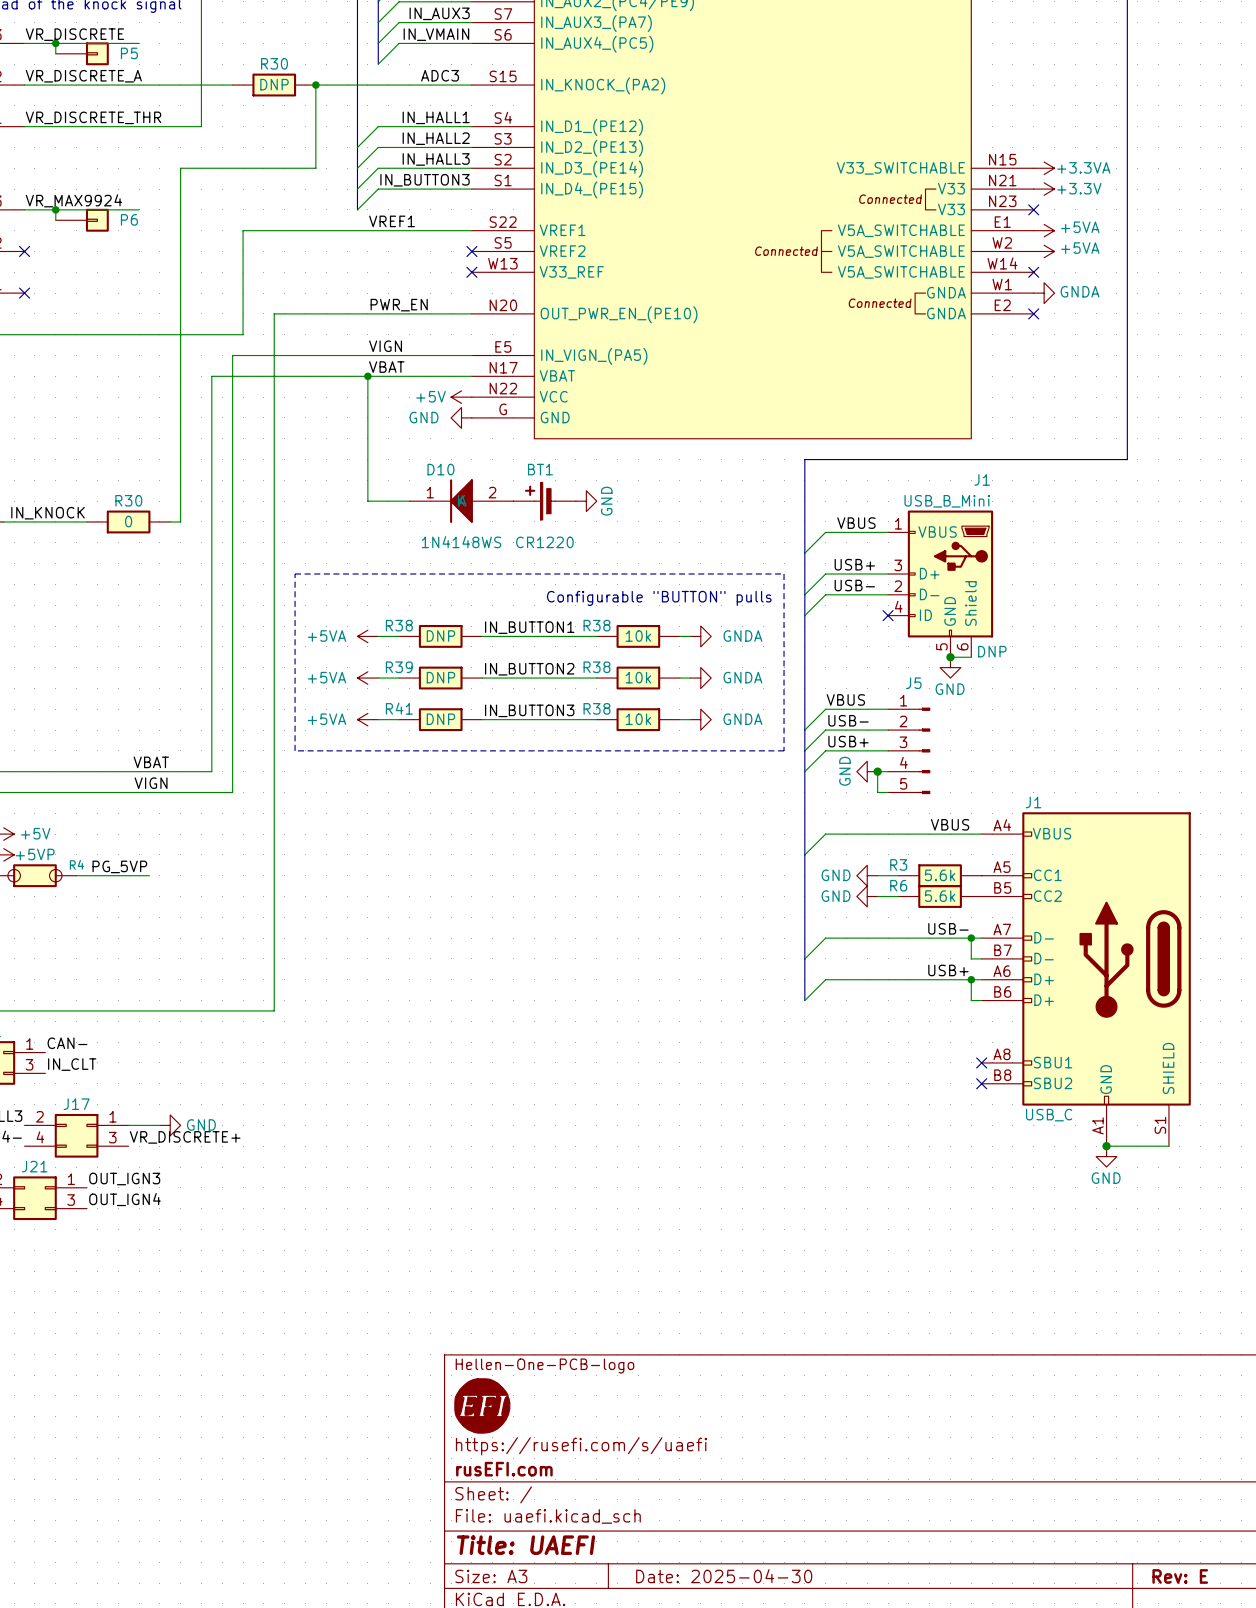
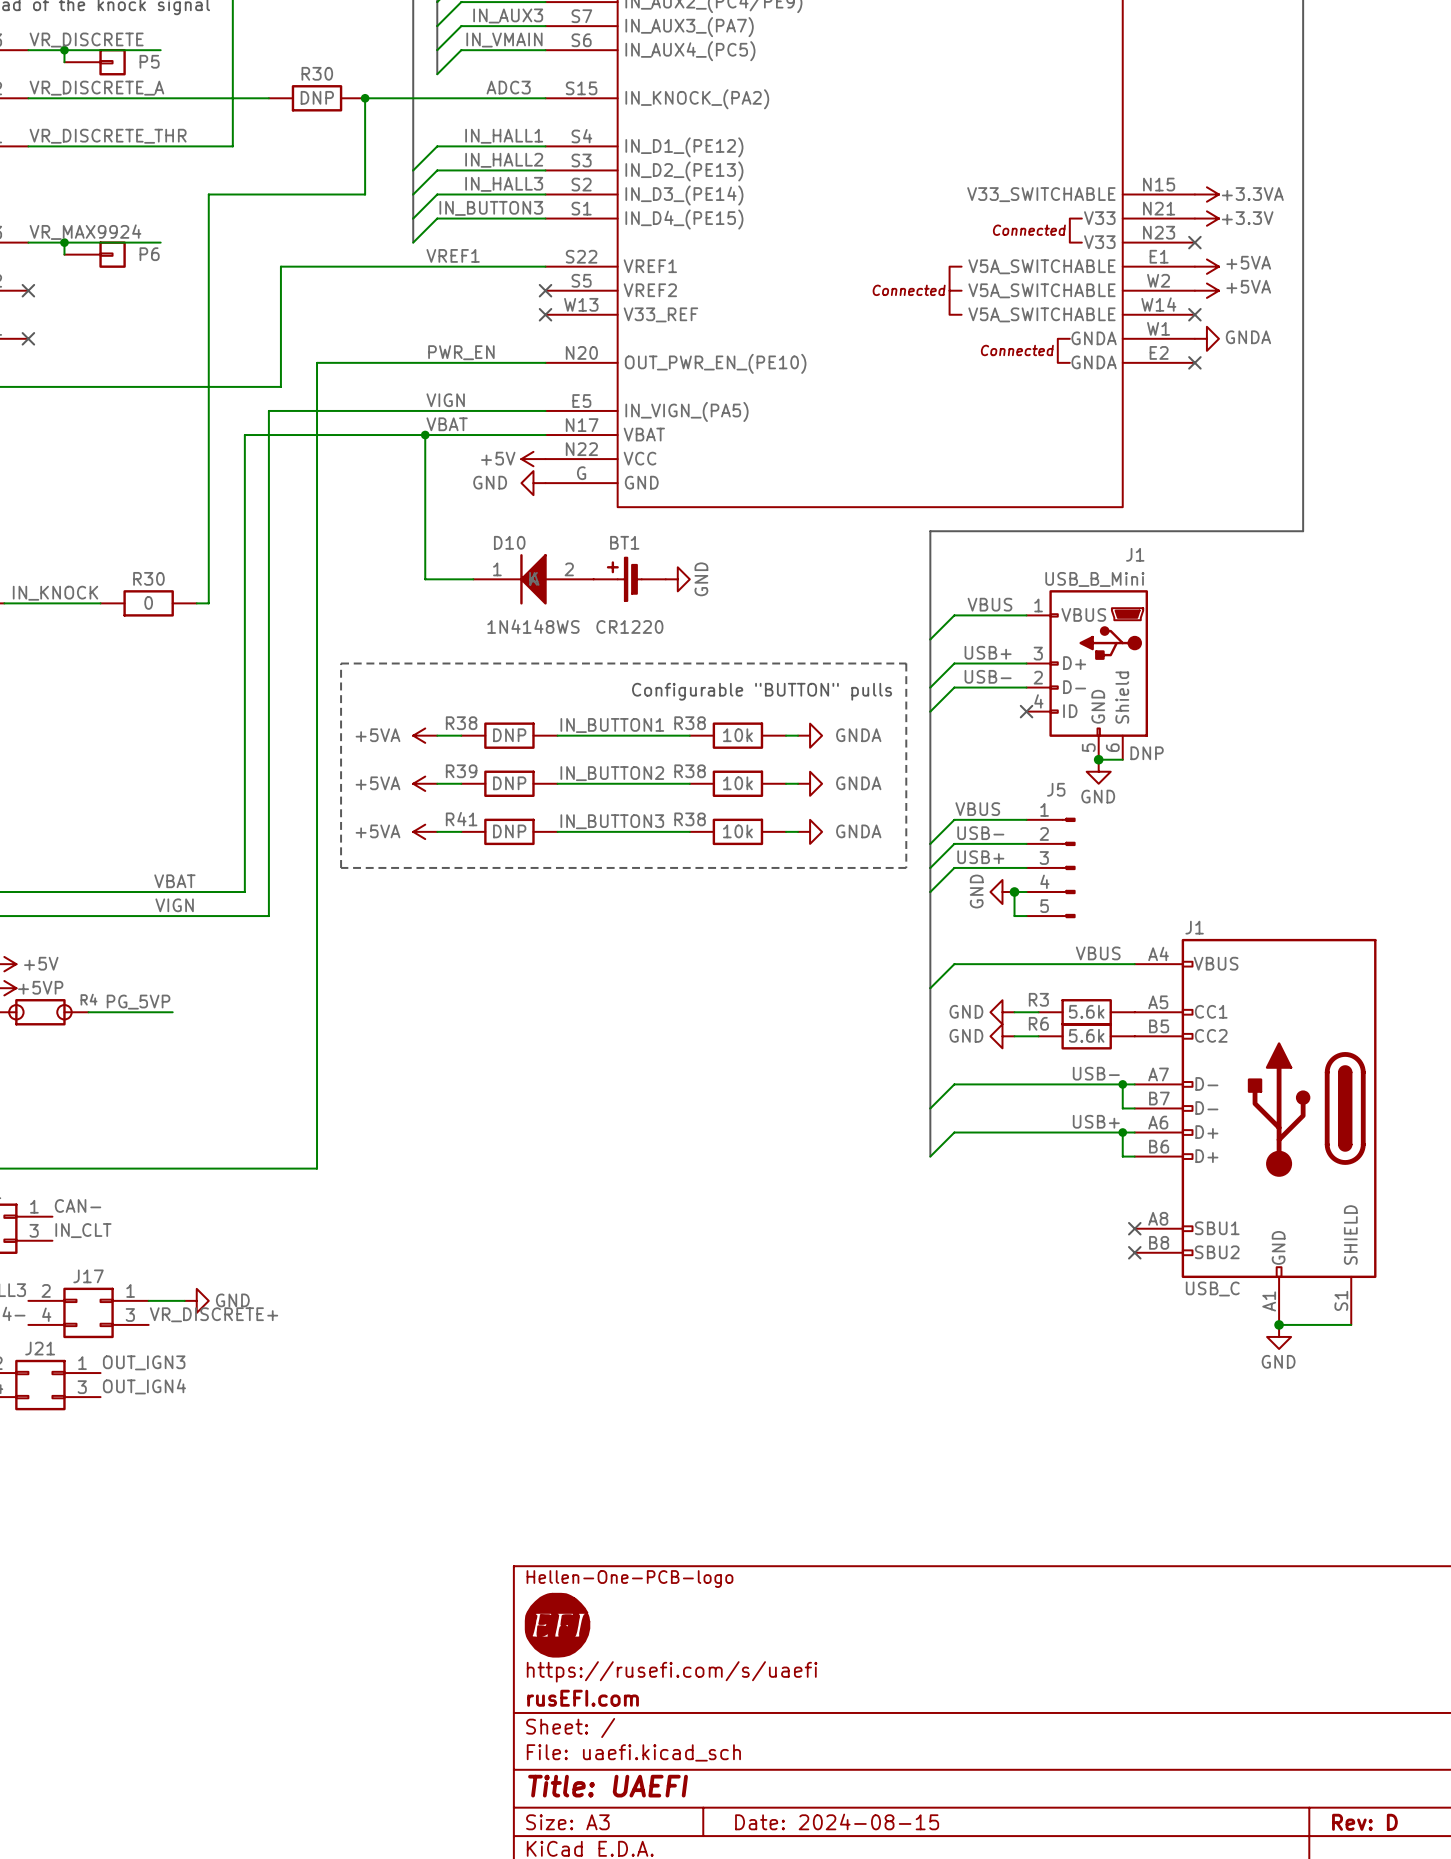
title block: Date: 2025-04-30 (724, 1576) -> Date: 2024-08-15 (837, 1821)
title block: Rev: E (1180, 1576) -> Rev: D (1364, 1822)

